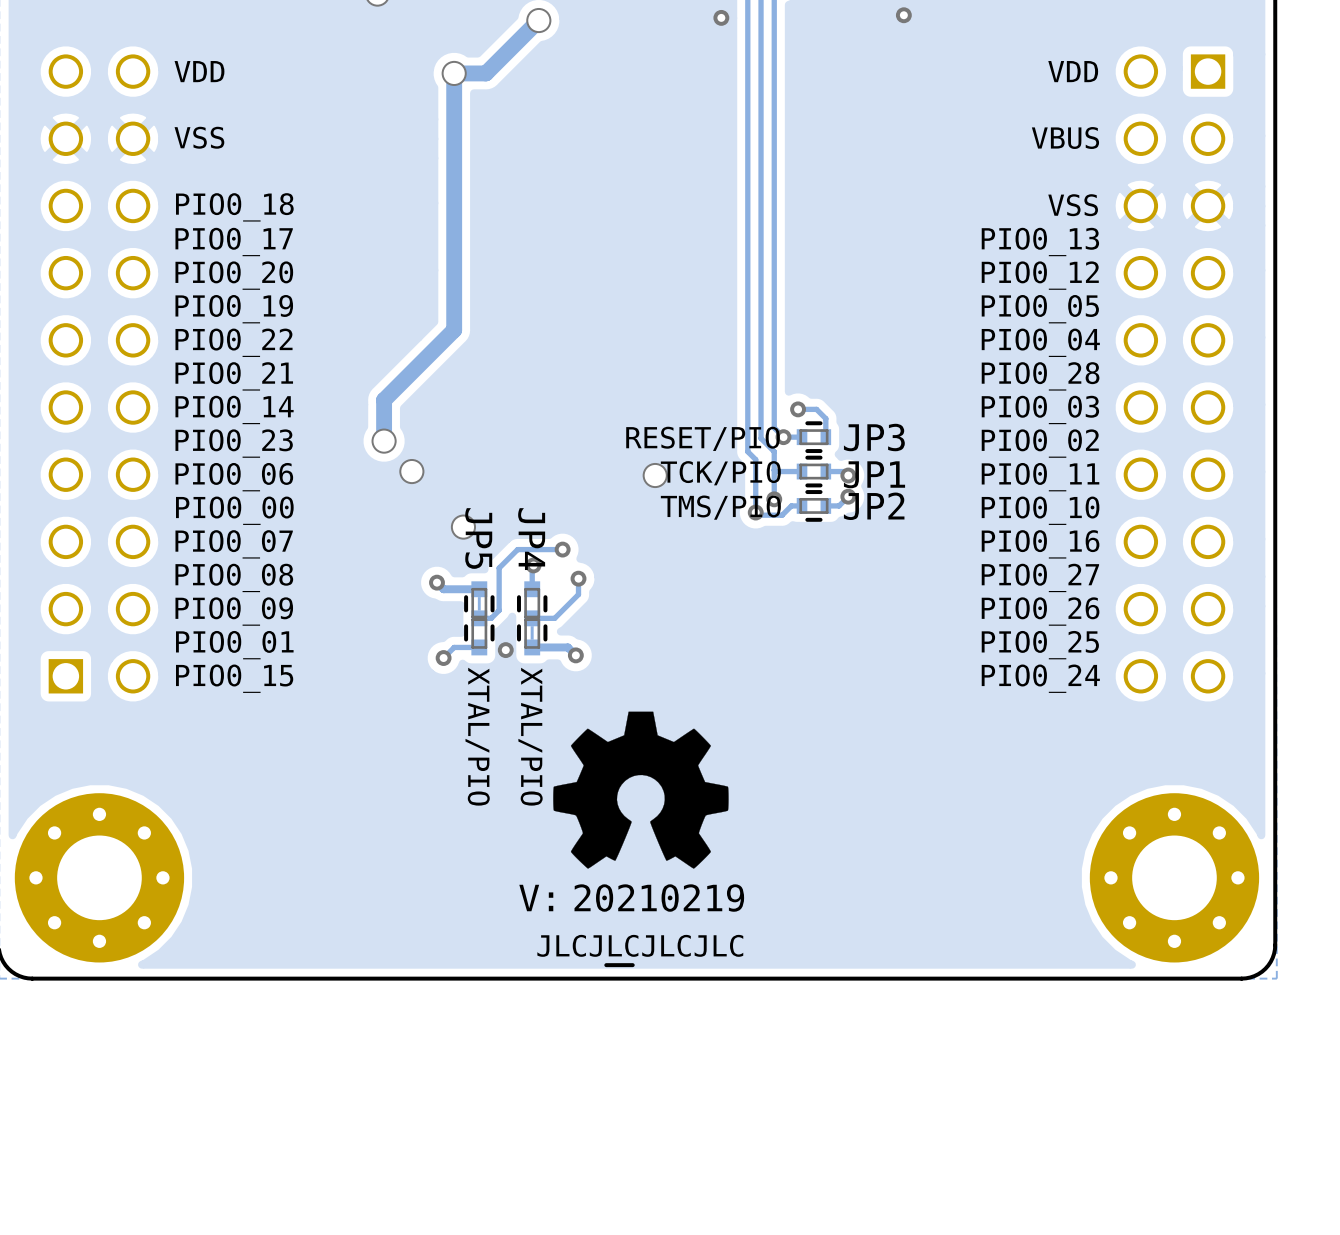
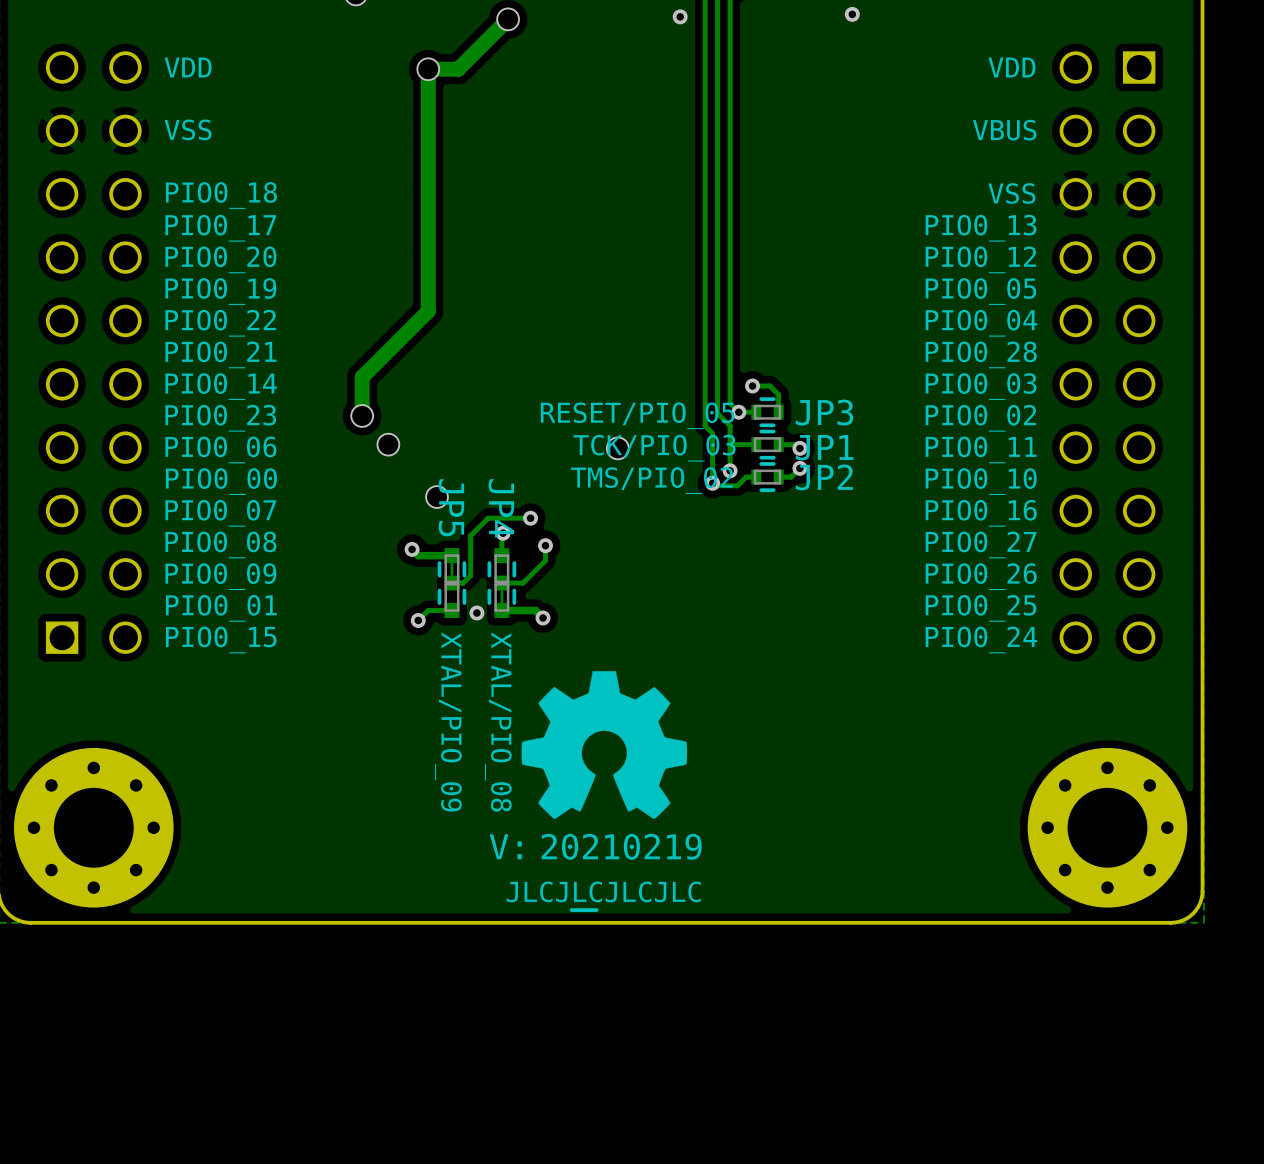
JP3 value: RESET/PIO (703, 438) -> RESET/PIO_05 (637, 415)
JP1 value: TCK/PIO (720, 473) -> TCK/PIO_03 (654, 448)
JP2 value: TMS/PIO (720, 507) -> TMS/PIO_02 (651, 480)
JP5 value: XTAL/PIO (477, 736) -> XTAL/PIO_09 (448, 721)
JP4 value: XTAL/PIO (530, 736) -> XTAL/PIO_08 (498, 722)

